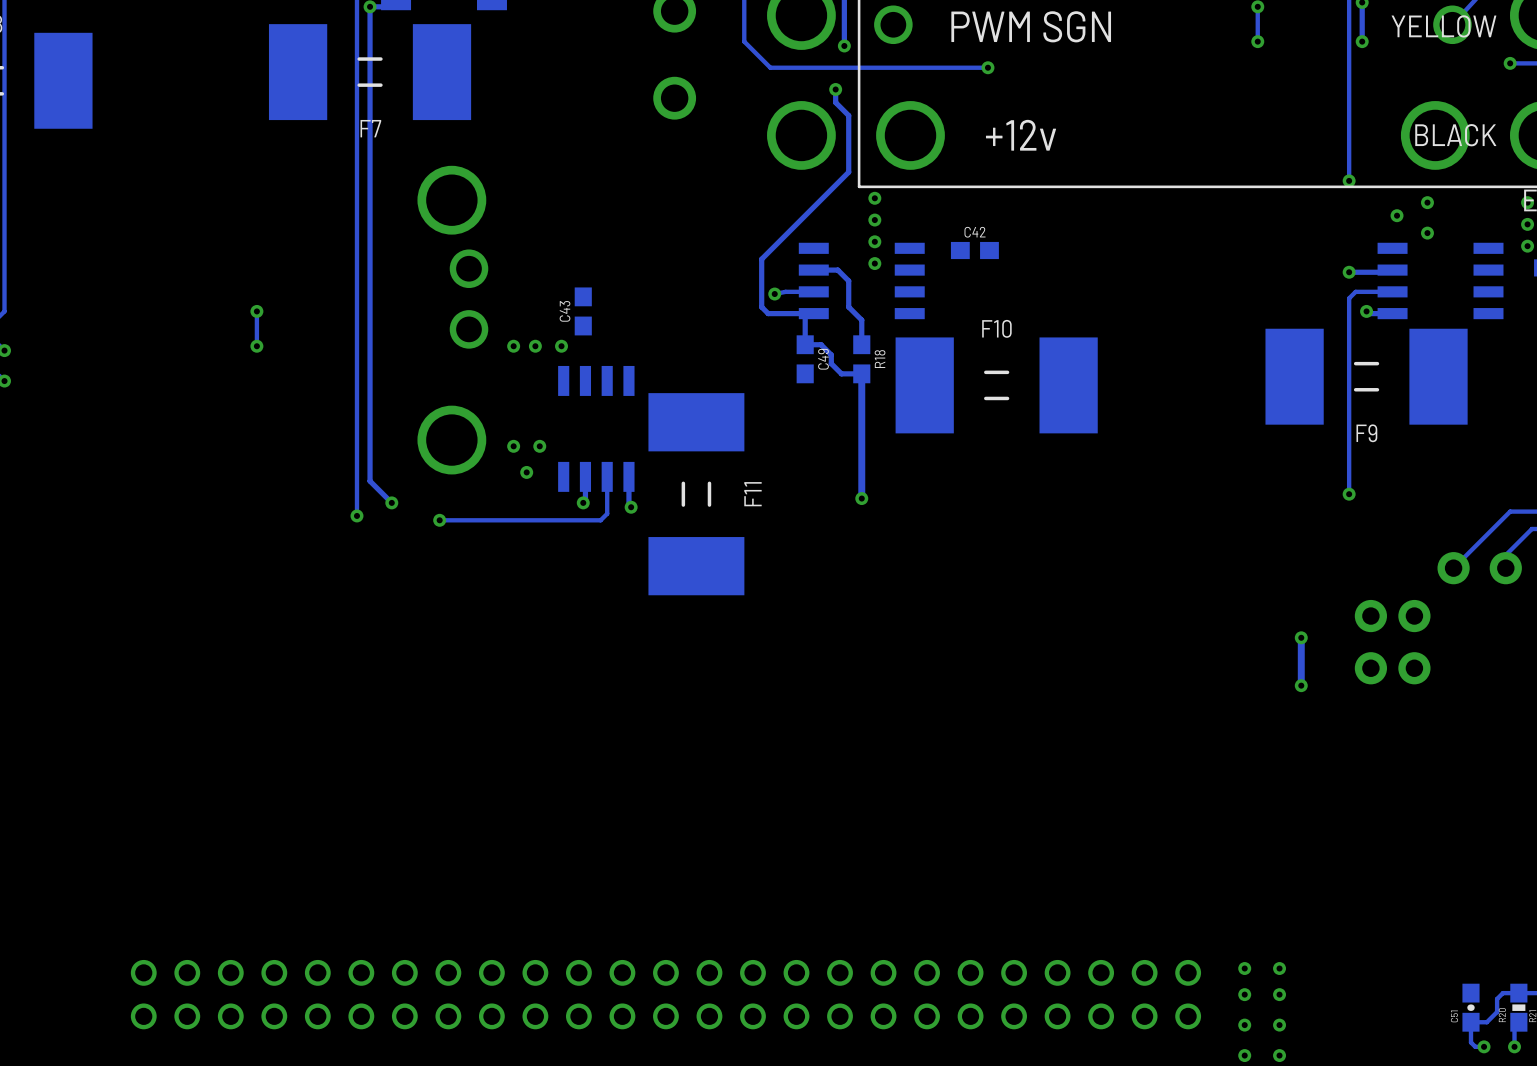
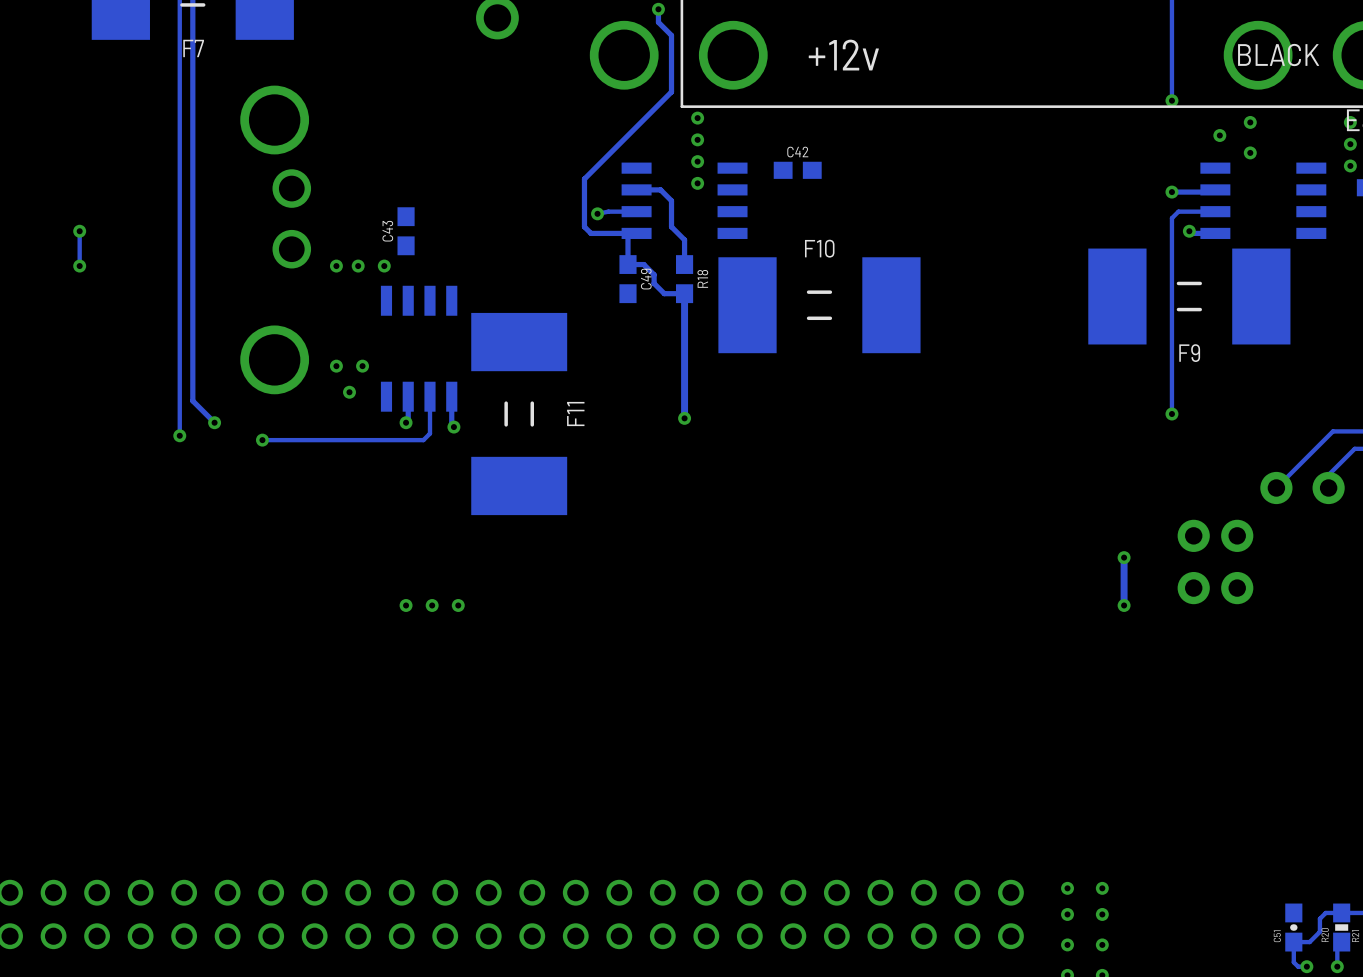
via: none -> (406, 605)
via: none -> (432, 605)
via: none -> (458, 605)

